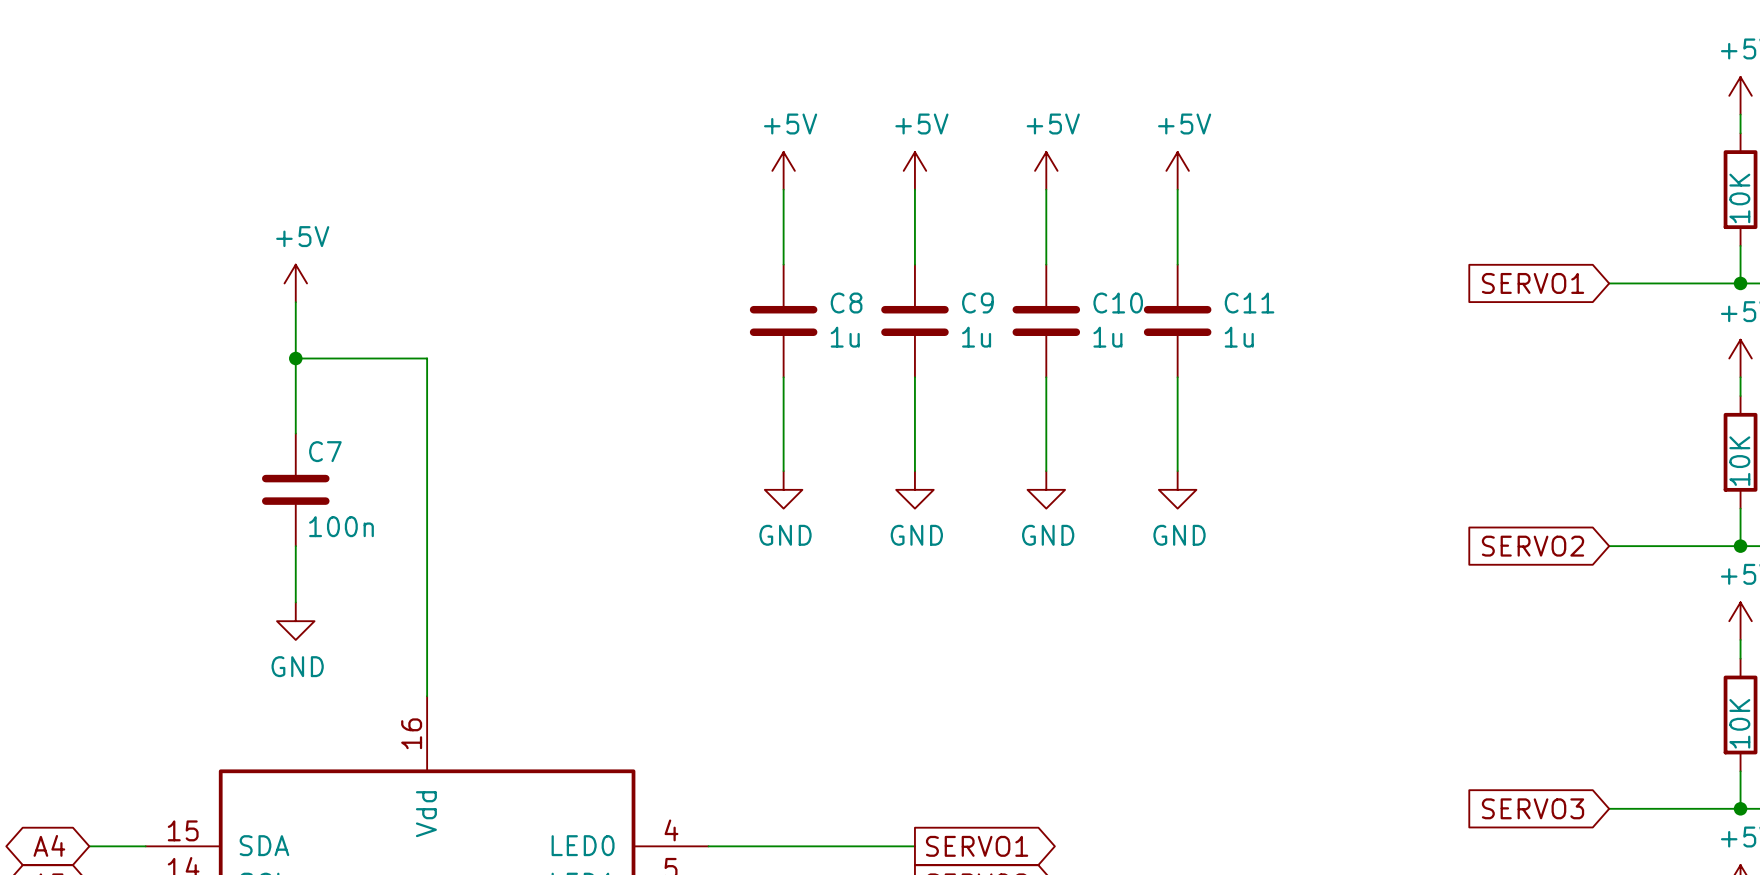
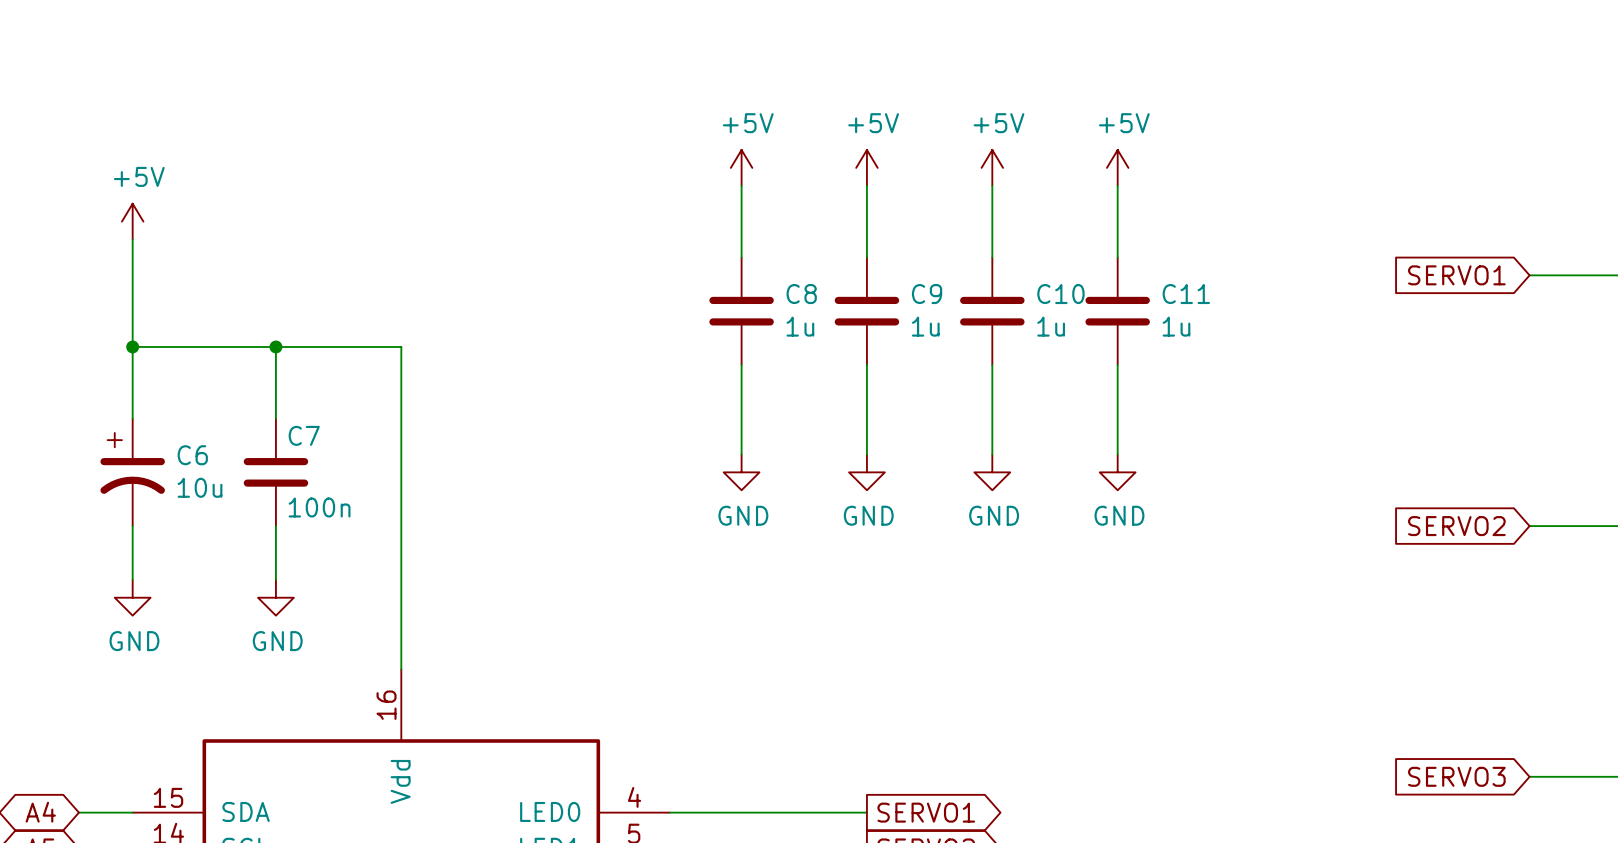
wire: none -> (132, 239) (132, 418)
power symbol position: +5V (295, 283) -> +5V (132, 221)
wire: (295, 302) (295, 358) -> (132, 346) (275, 346)
junction: none -> (132, 346)
C6: none -> 10u (132, 472)
wire: none -> (132, 526) (132, 579)
power symbol: none -> GND (132, 597)

